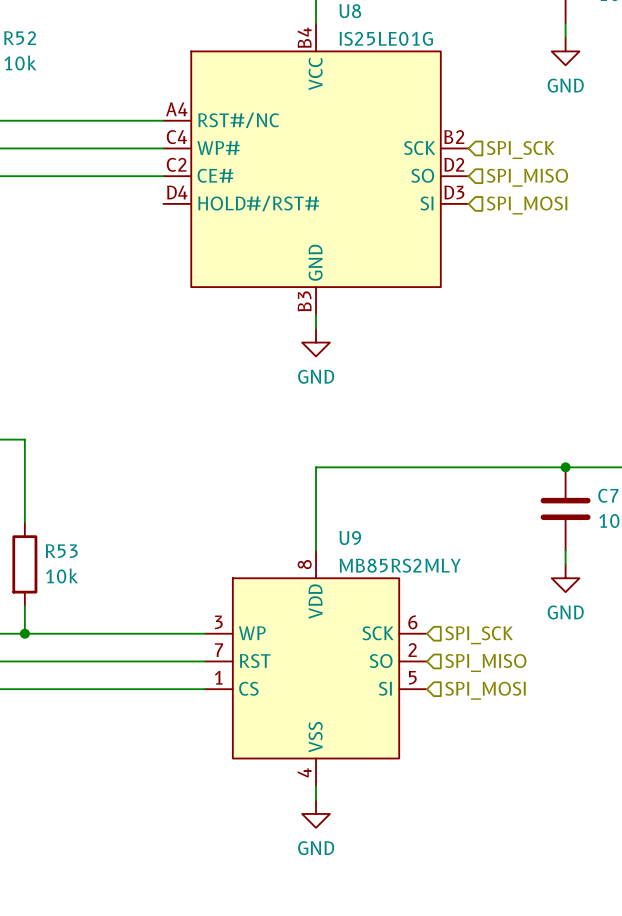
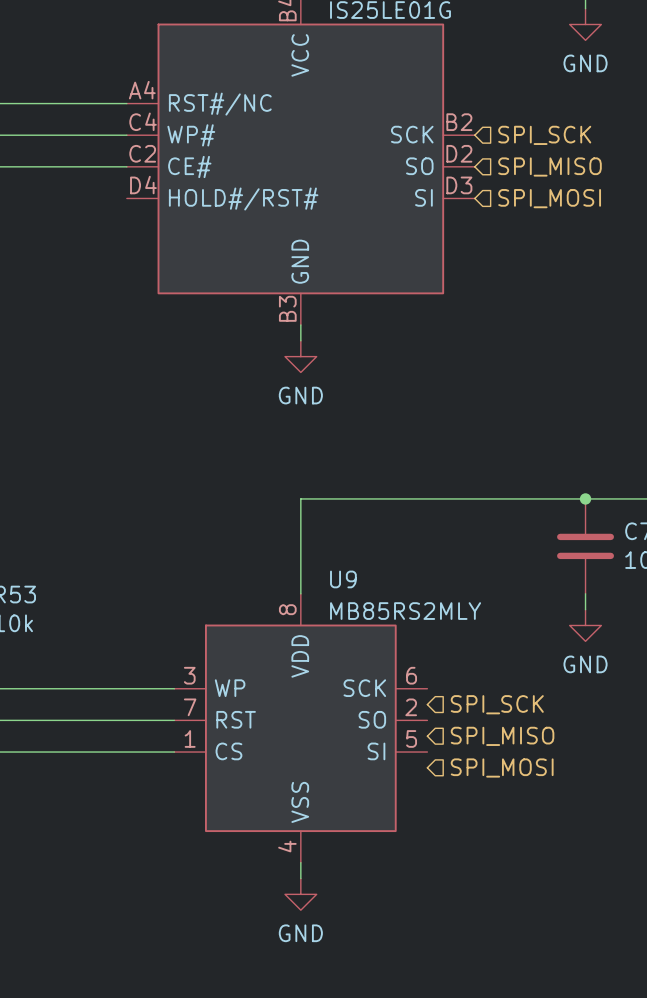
hierarchical label position: SPI_SCK (479, 635) -> SPI_SCK (497, 704)
hierarchical label position: SPI_MISO (485, 663) -> SPI_MISO (502, 736)
hierarchical label position: SPI_MOSI (485, 690) -> SPI_MOSI (502, 767)

